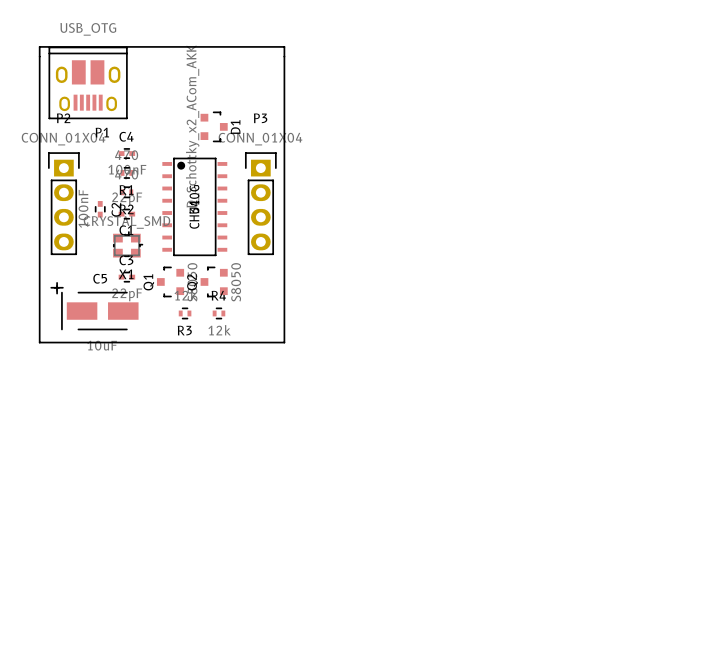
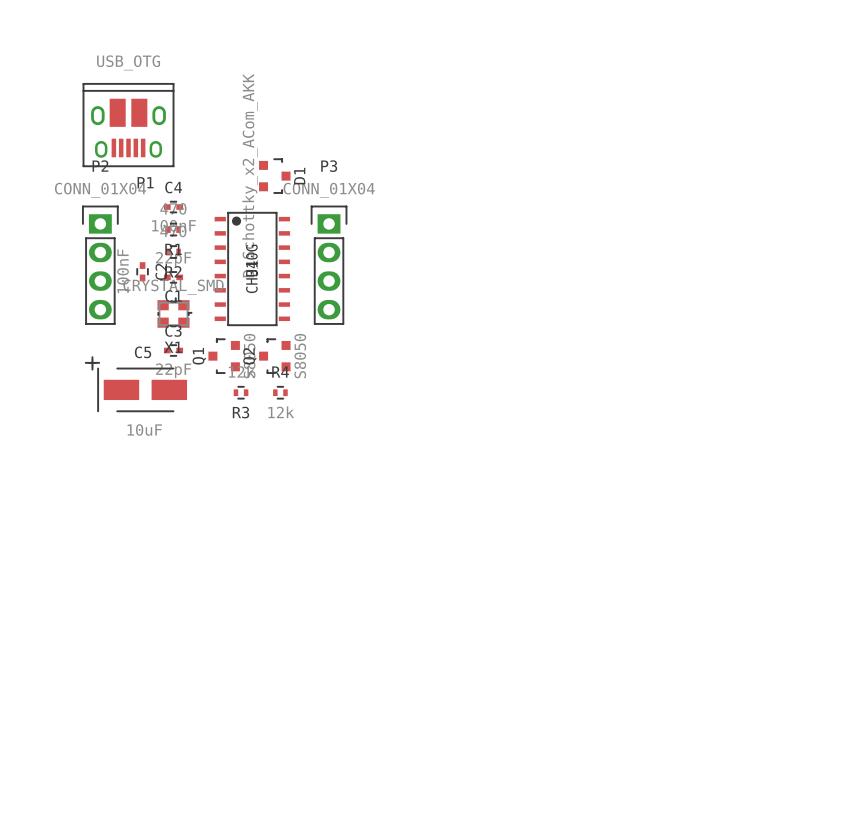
board edge: (39, 46) (284, 46) (284, 342) (39, 342) (39, 46) -> none

